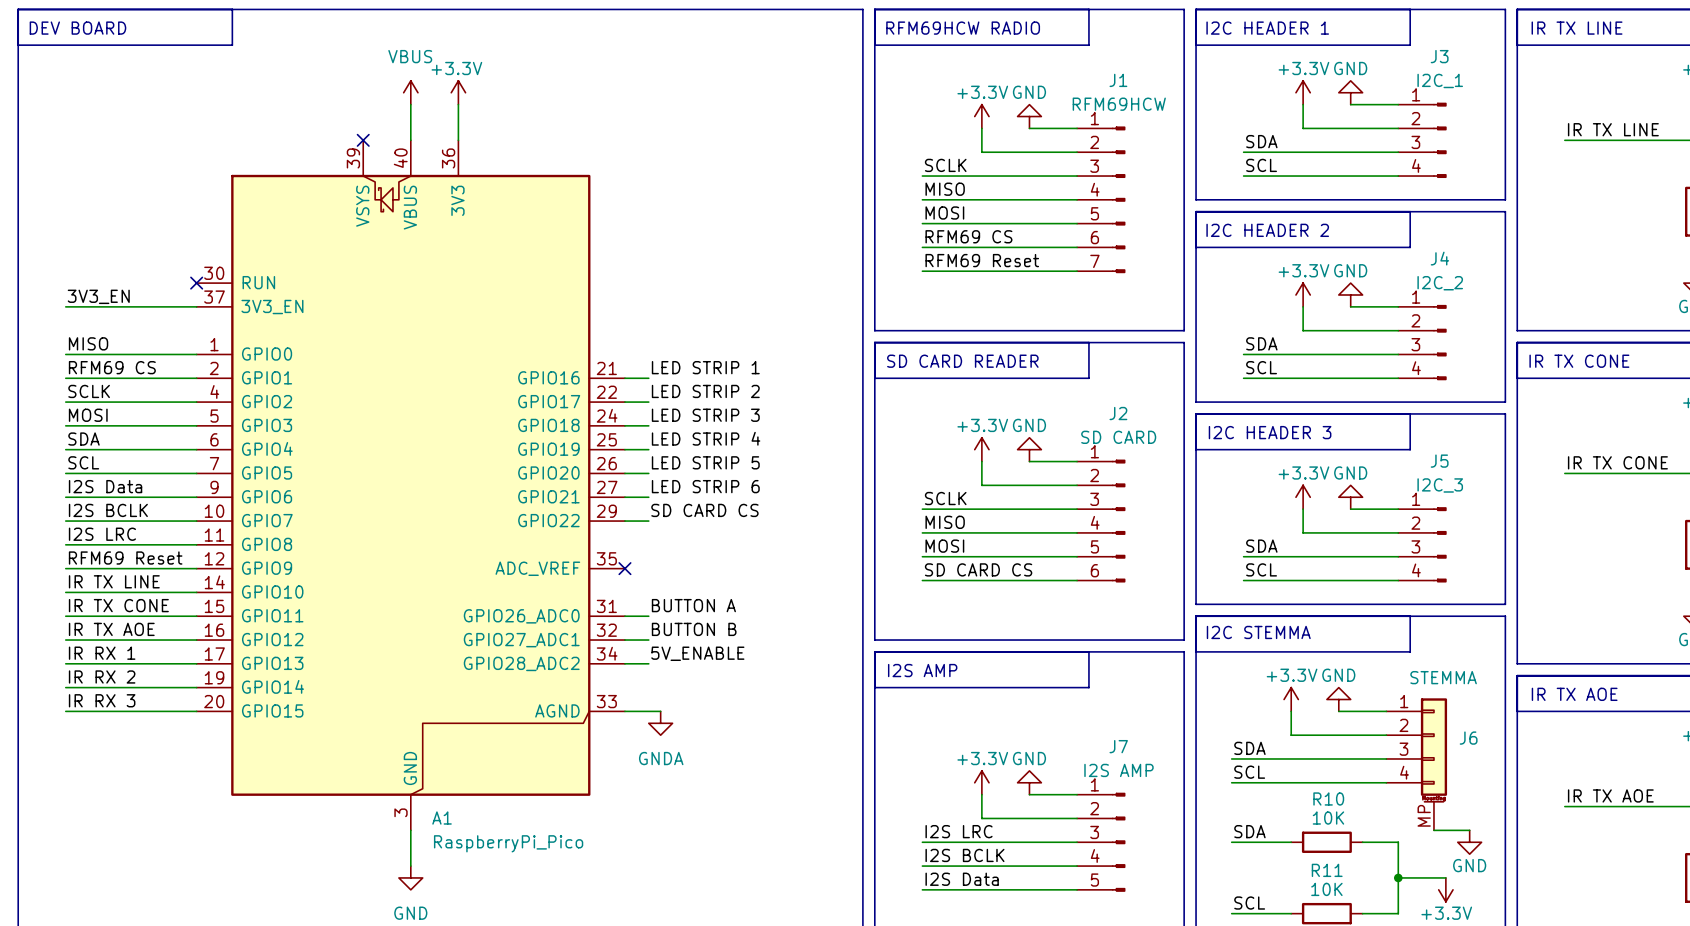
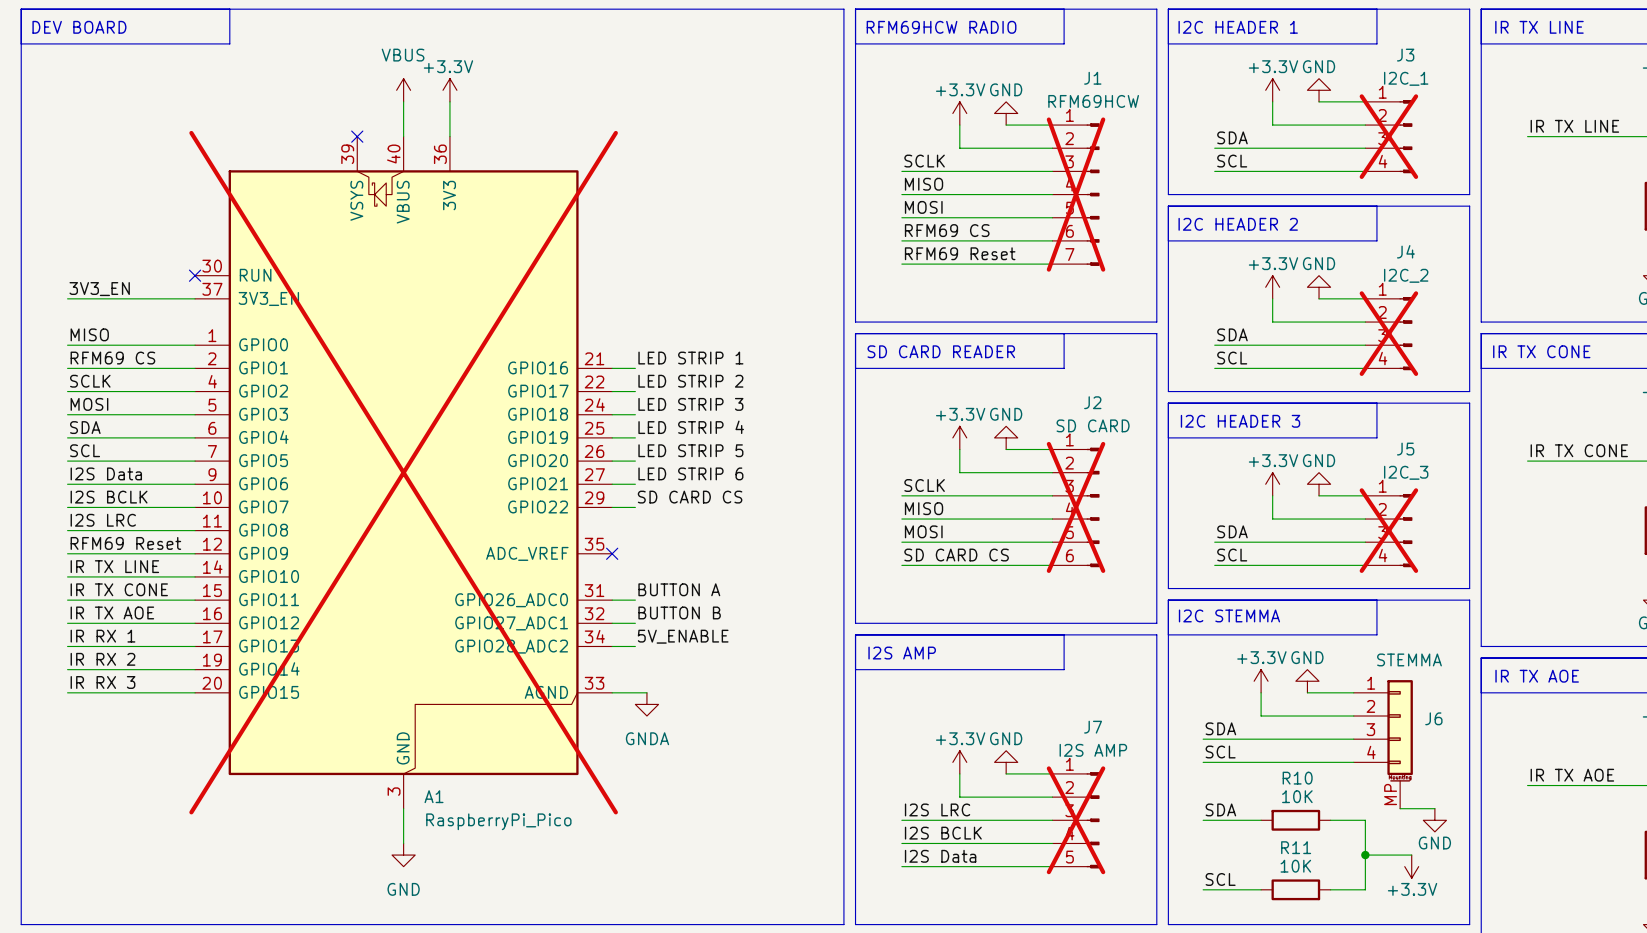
J3 do-not-place cross: none -> (1388, 136)
J1 do-not-place cross: none -> (1076, 194)
J4 do-not-place cross: none -> (1388, 333)
A1 do-not-place cross: none -> (403, 472)
J2 do-not-place cross: none -> (1076, 507)
J5 do-not-place cross: none -> (1388, 530)
J7 do-not-place cross: none -> (1076, 820)

